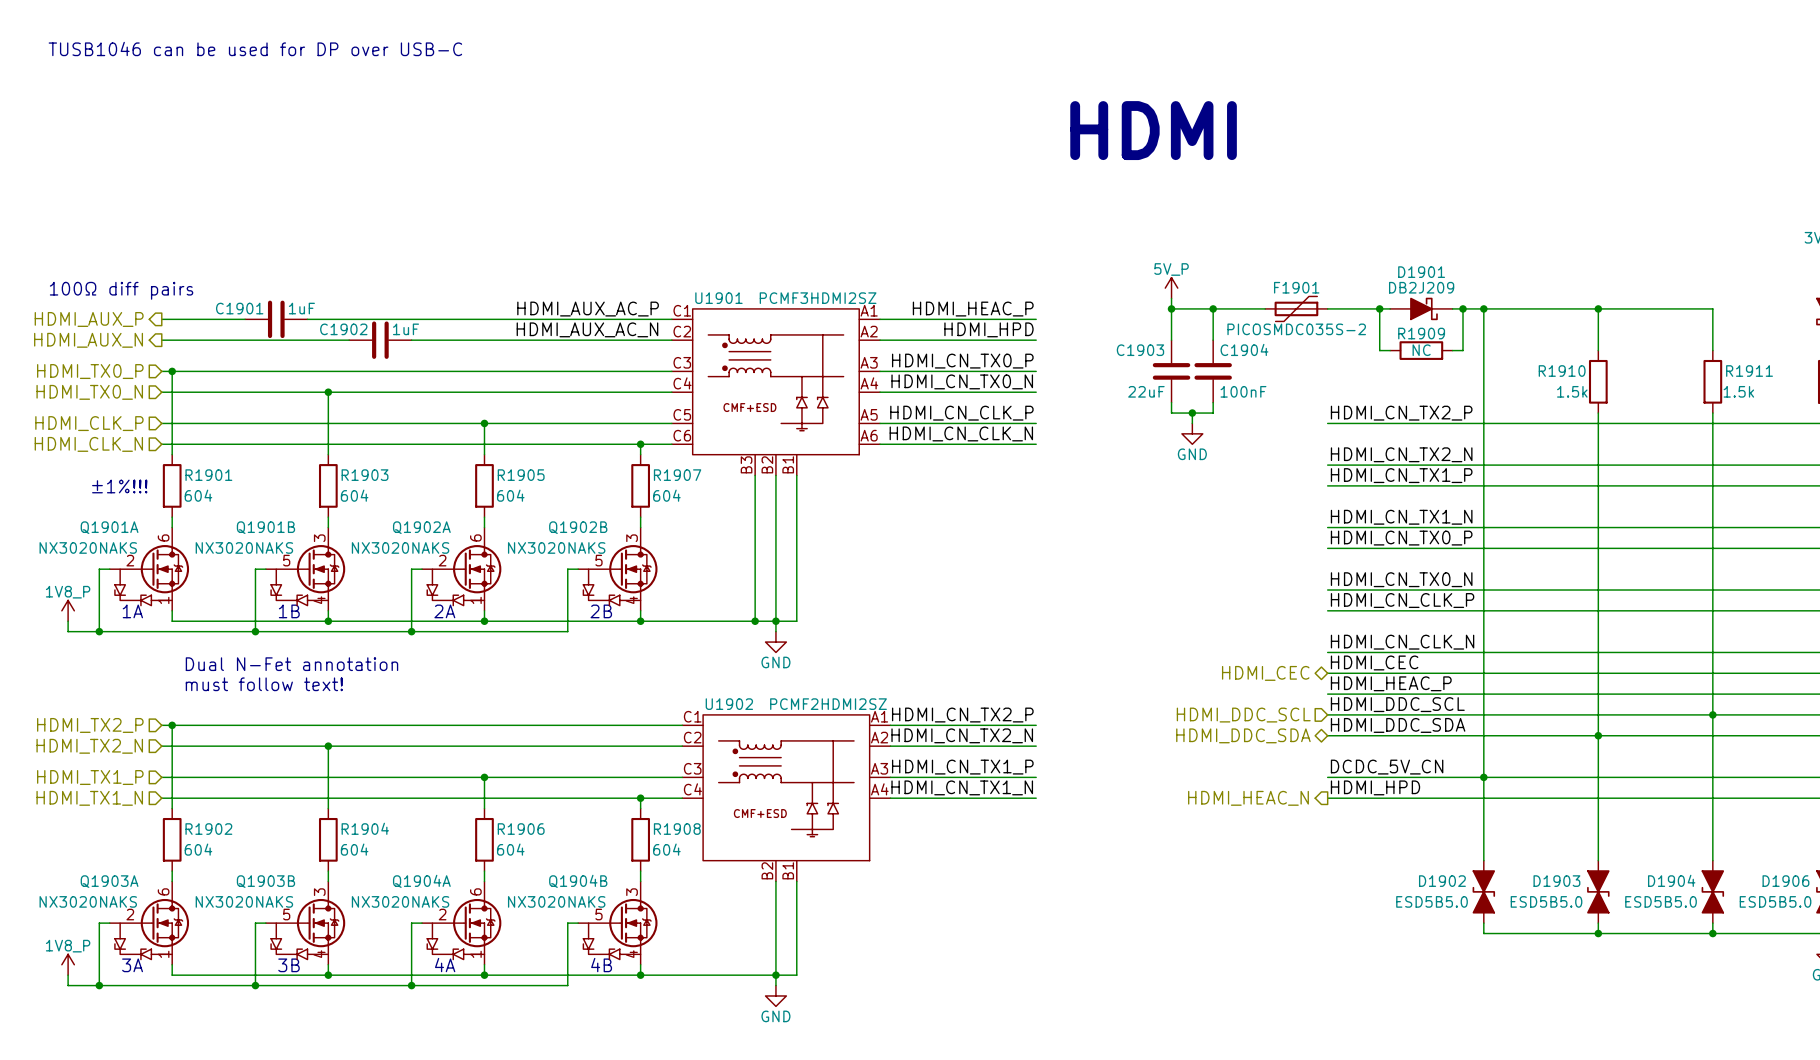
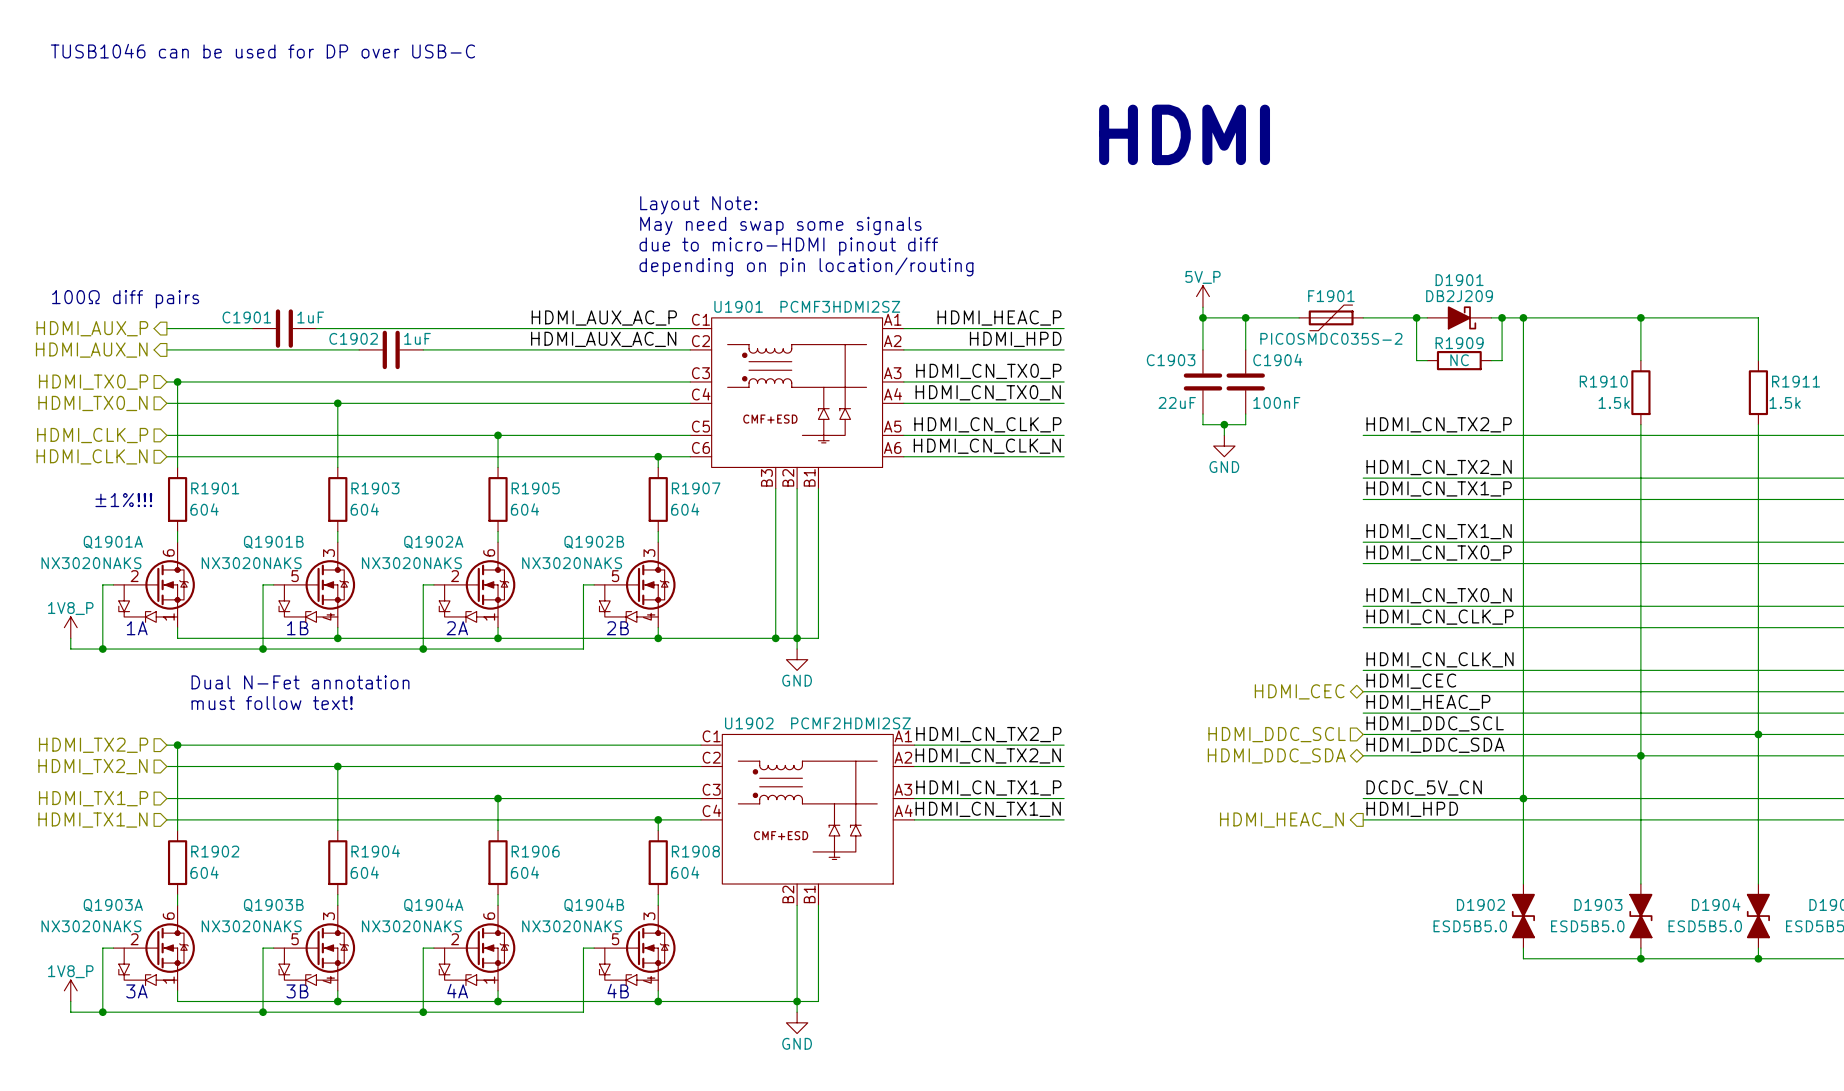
text: none -> Layout Note: (698, 205)
text: none -> May need swap some signals (780, 225)
text: none -> due to micro-HDMI pinout diff (788, 246)
text: none -> depending on pin location/routing (806, 266)

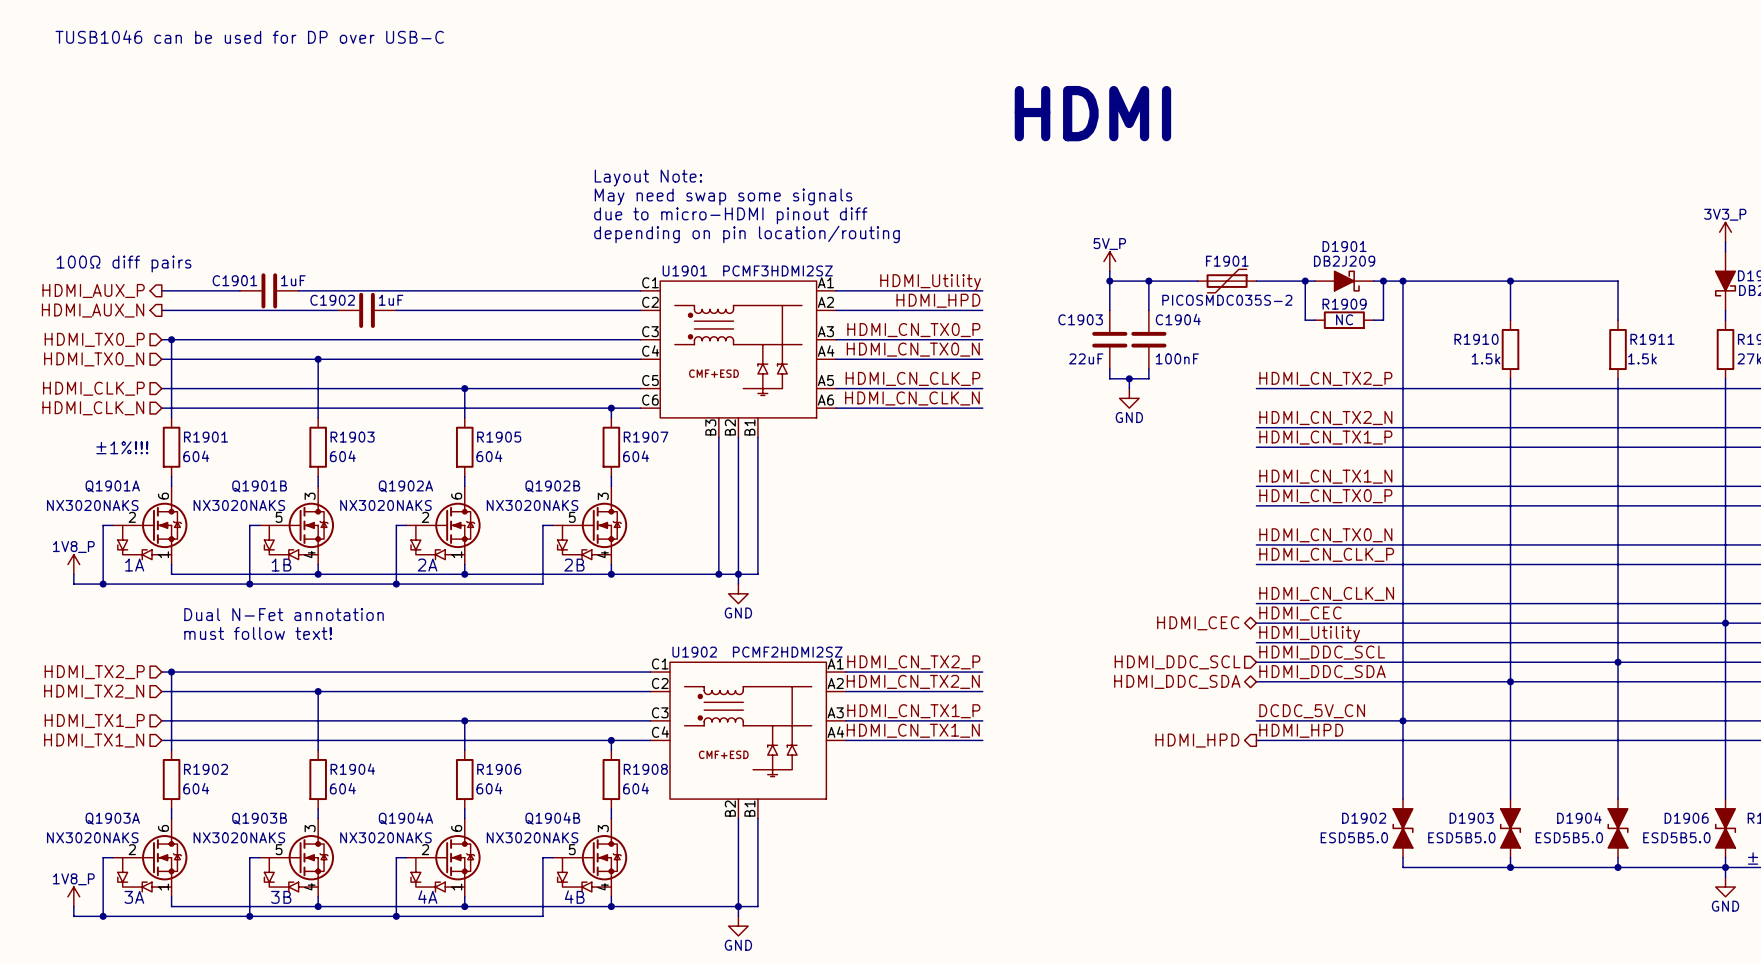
label: HDMI_AUX_AC_P (604, 318) -> none
label: HDMI_HEAC_P (999, 318) -> HDMI_Utility (930, 282)
label: HDMI_AUX_AC_N (603, 339) -> none
label: HDMI_HEAC_P (1428, 702) -> HDMI_Utility (1309, 634)
hierarchical label: HDMI_HEAC_N (1281, 820) -> HDMI_HPD (1197, 740)

